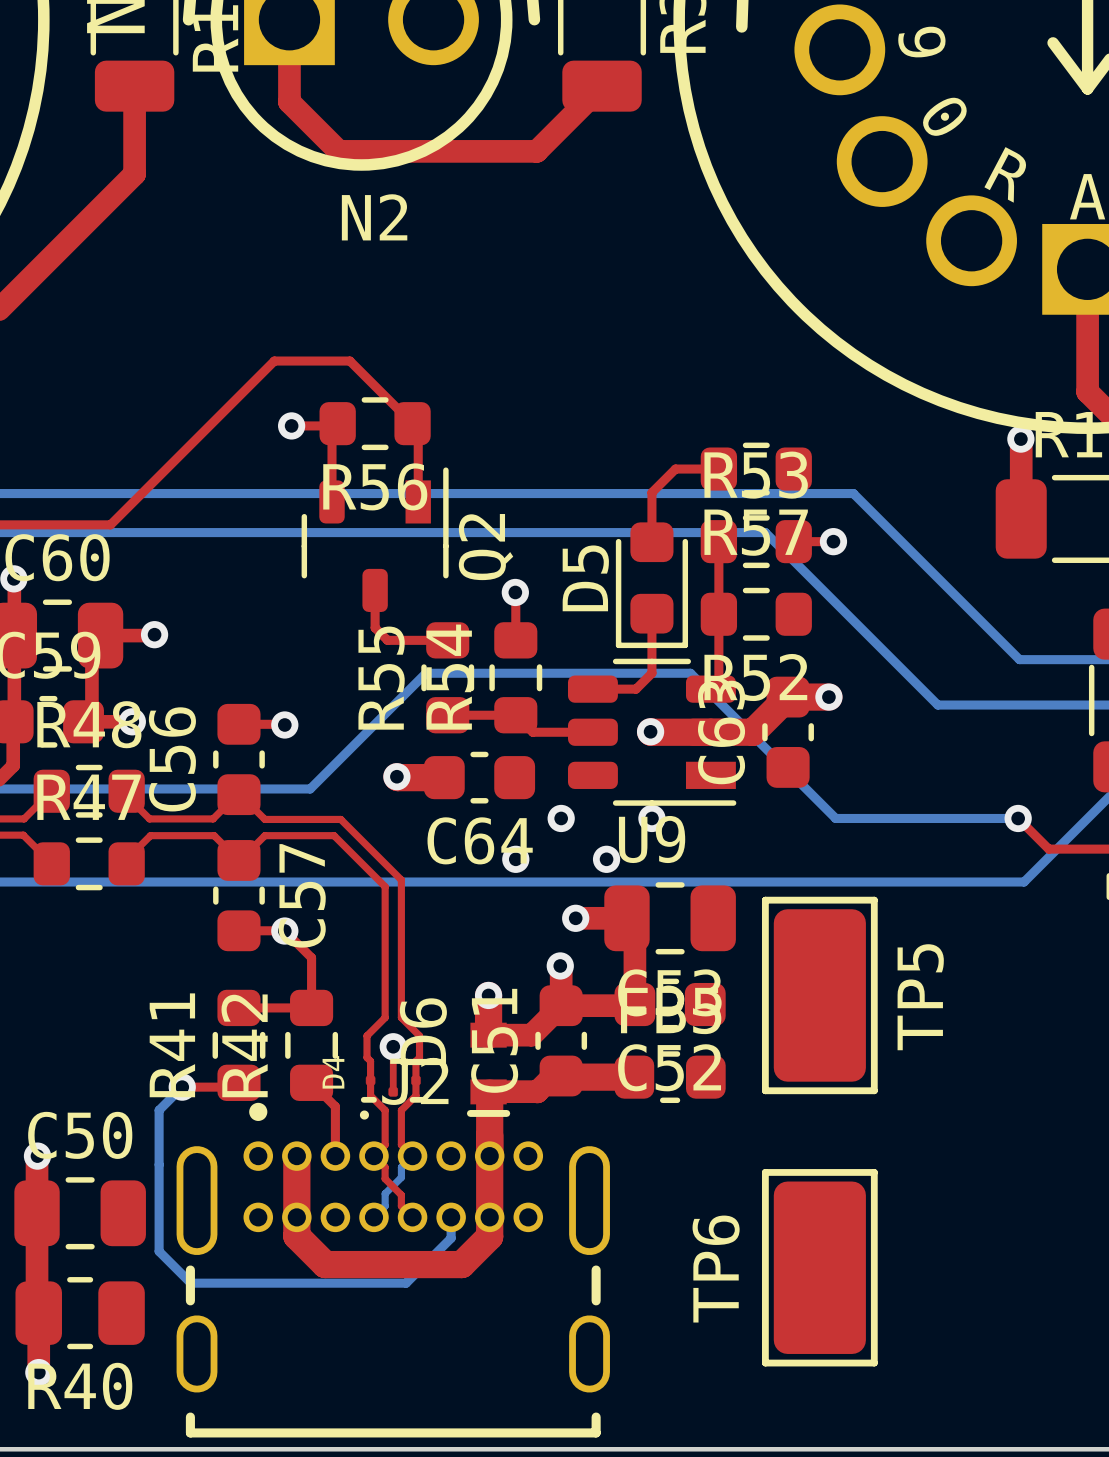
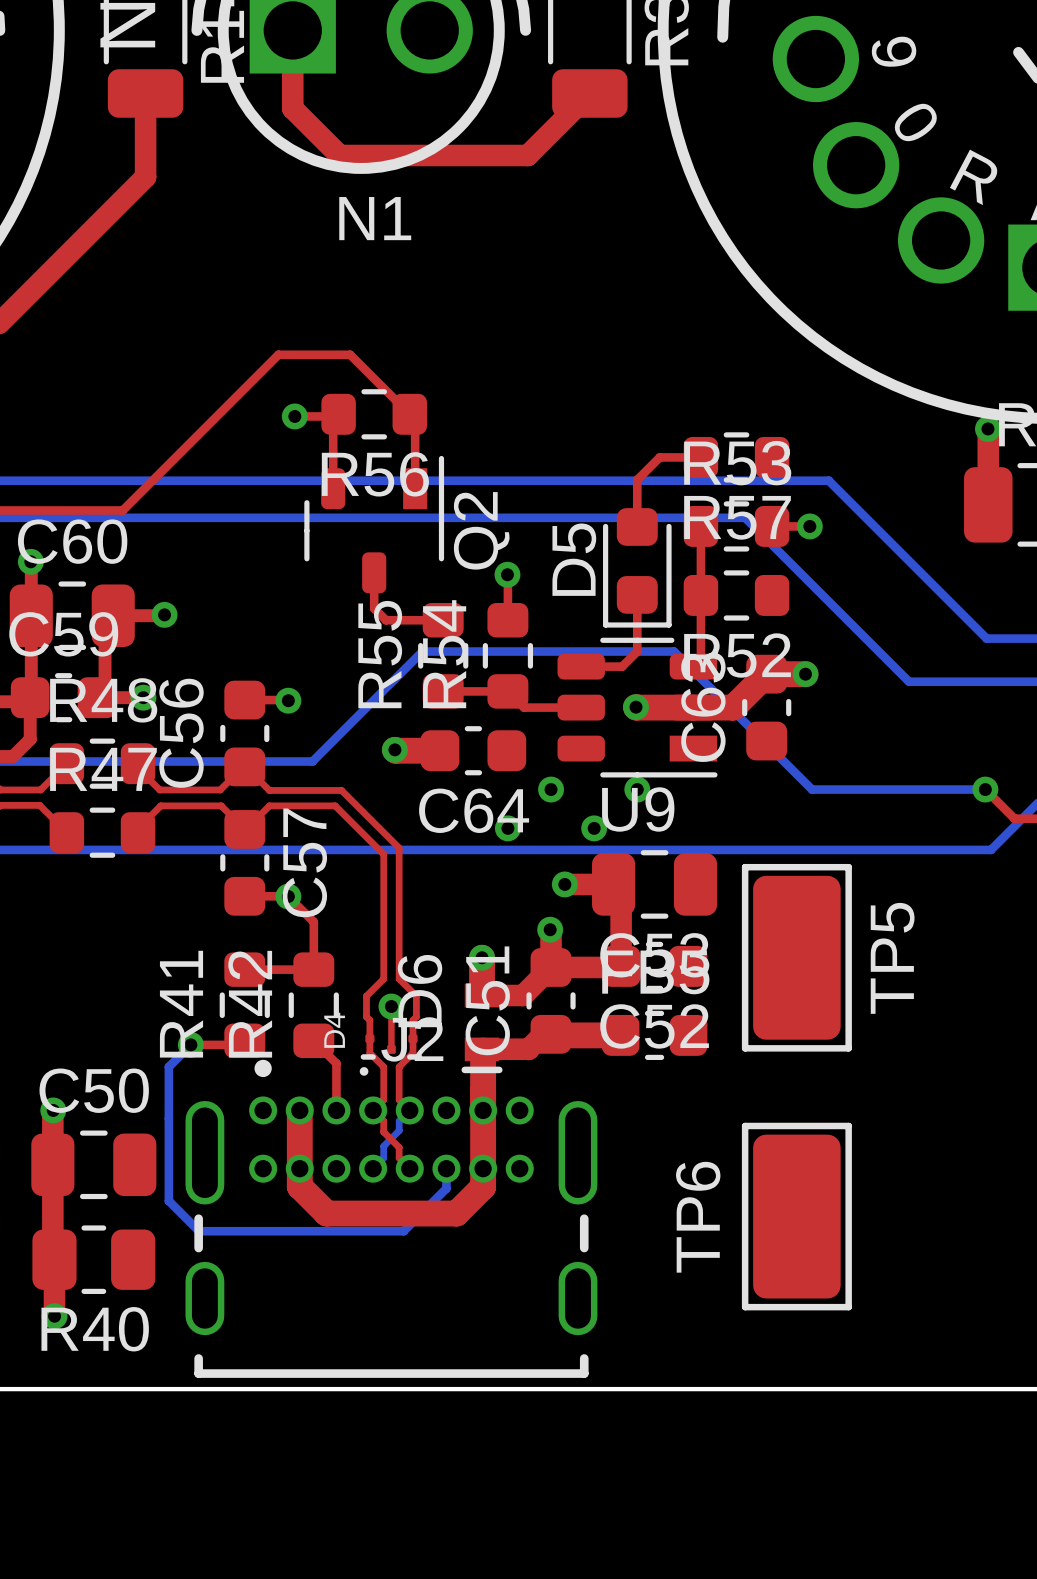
N2 name: N2 (374, 217) -> N1 (375, 218)

